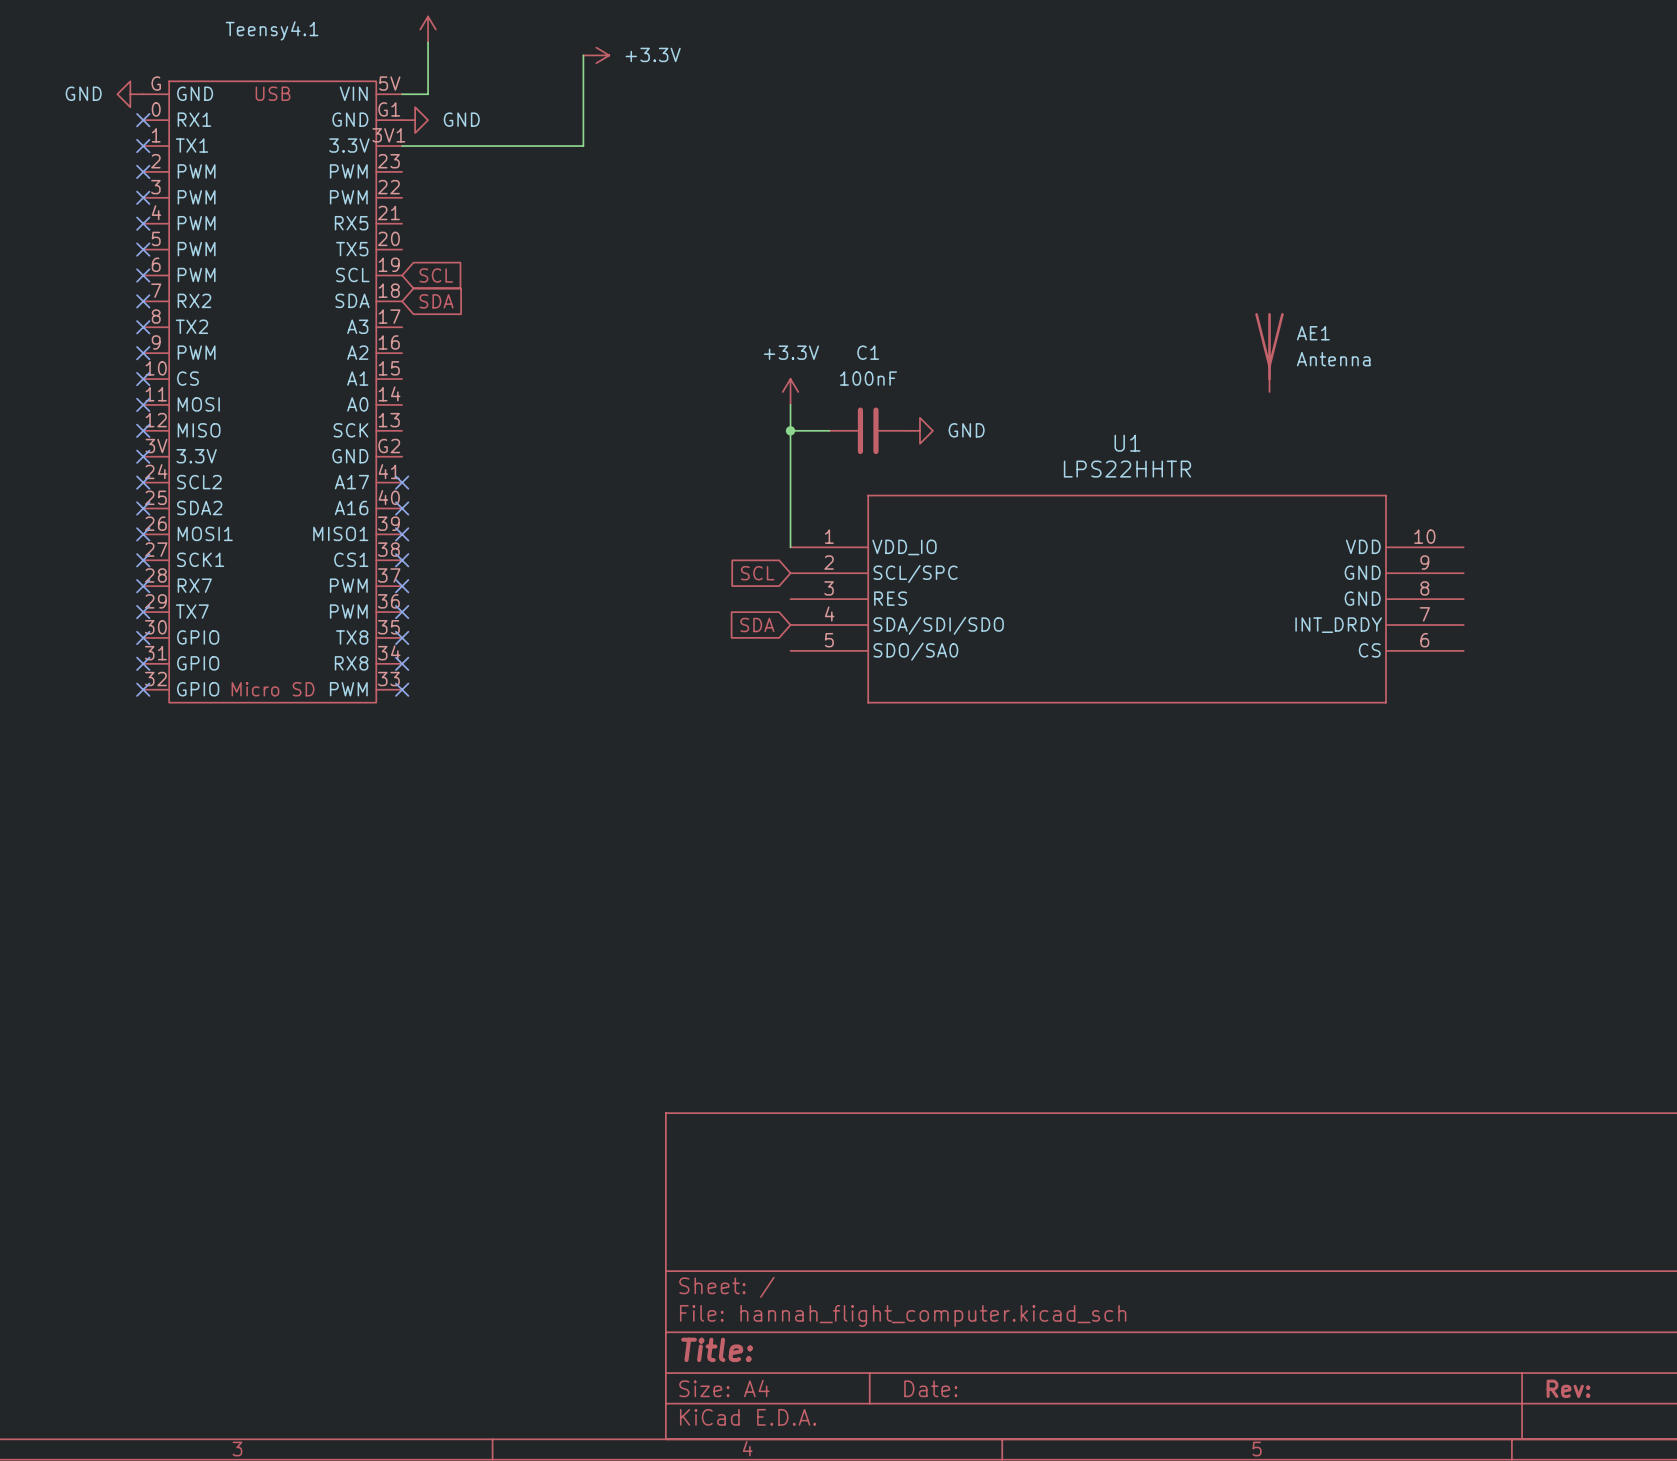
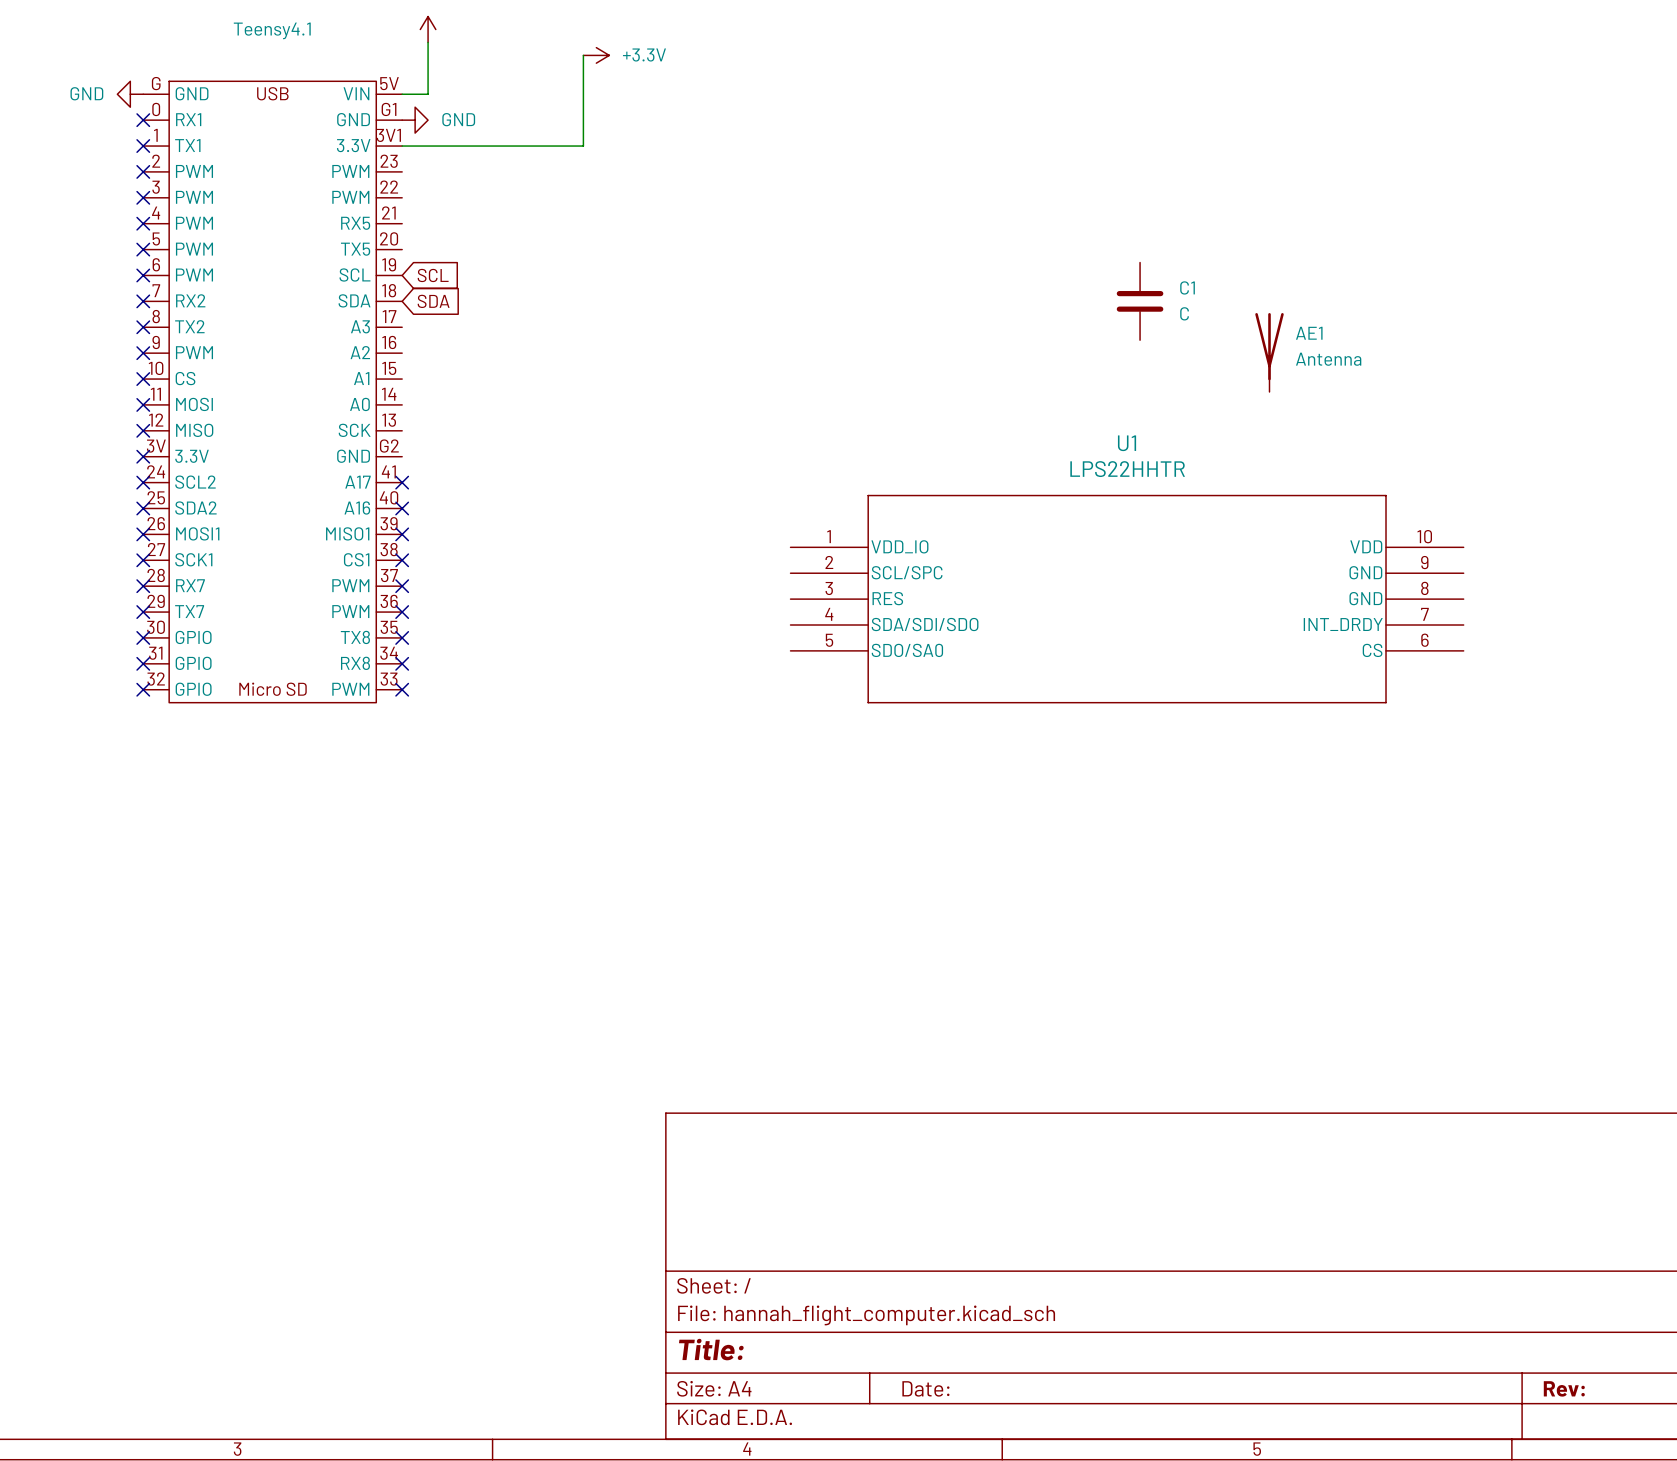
C1 name position: C1 (868, 352) -> C1 (1187, 287)
C1 value: 100nF (868, 378) -> C (1184, 313)
power symbol: +3.3V (790, 391) -> none
wire: (790, 404) (790, 547) -> none
wire: (790, 430) (829, 430) -> none
junction: (790, 430) -> none
C1 rotation: 0° (868, 430) -> 90° clockwise (1140, 301)
C1 position: (868, 430) -> (1140, 301)
power symbol: GND (919, 430) -> none
global label: SCL (757, 573) -> none
global label: SDA (757, 625) -> none

